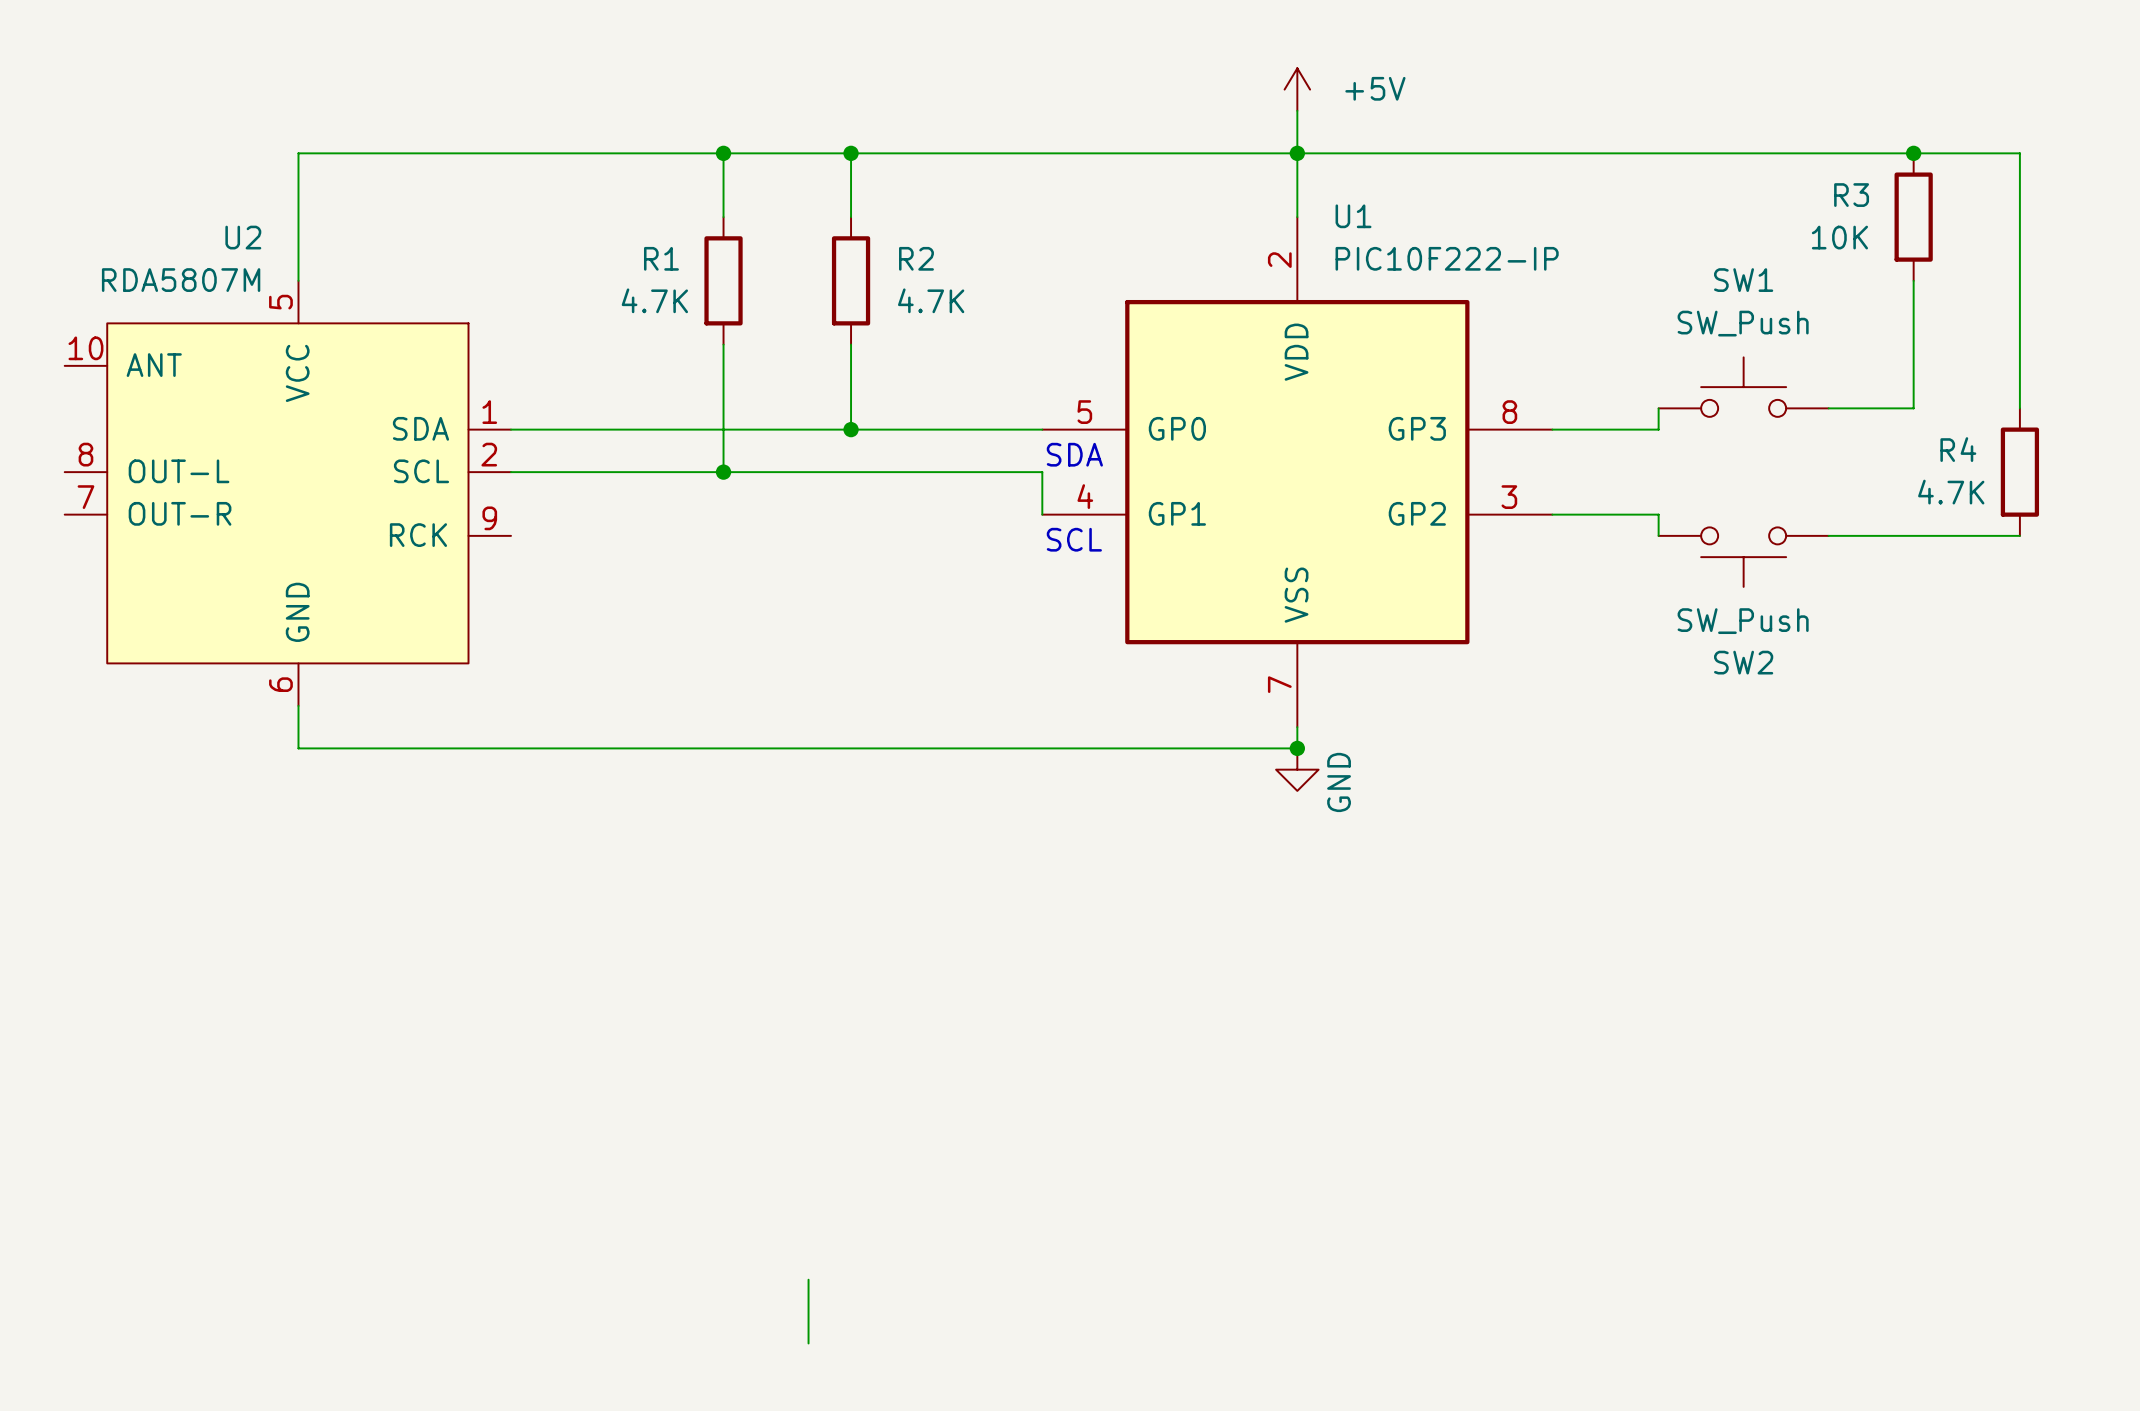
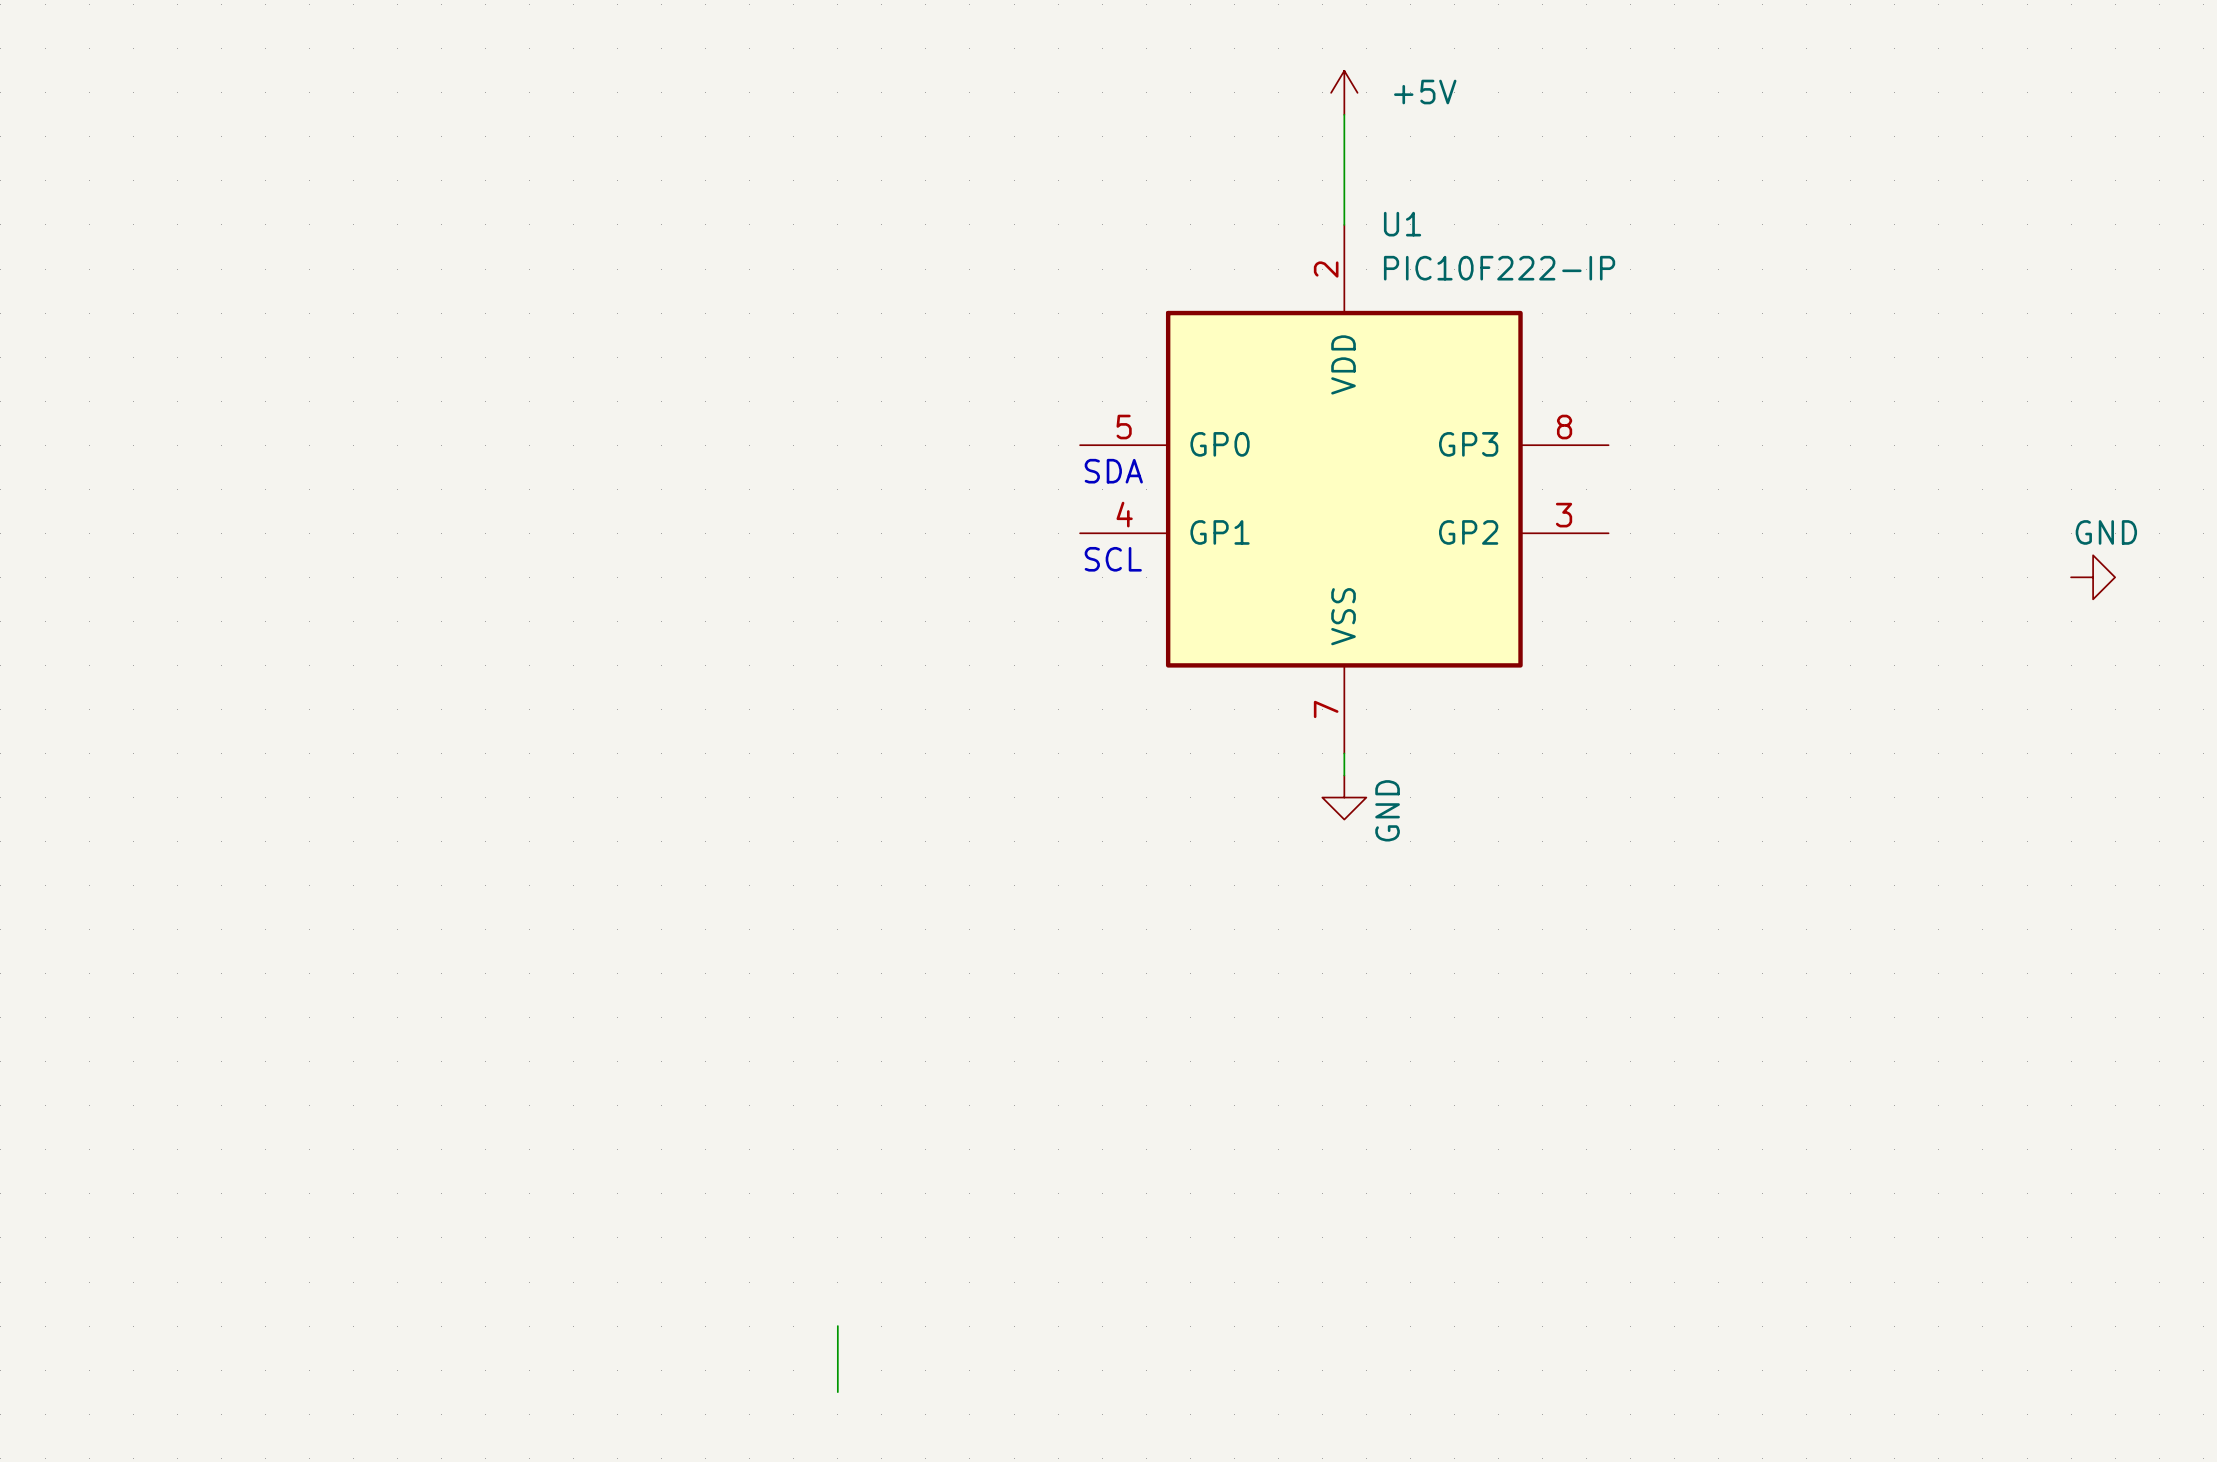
wire: (723, 153) (723, 217) -> none
junction: (723, 153) -> none
wire: (851, 153) (851, 217) -> none
junction: (851, 153) -> none
junction: (1297, 153) -> none
junction: (1913, 153) -> none
R3: 10K (1913, 217) -> none
wire: (298, 280) (298, 153) (2019, 153) (2019, 408) -> none
R1: 4.7K (723, 280) -> none
R2: 4.7K (851, 280) -> none
wire: (1913, 280) (1913, 408) (1828, 408) -> none
wire: (723, 344) (723, 472) -> none
wire: (851, 344) (851, 429) -> none
SW1: SW_Push (1743, 387) -> none
wire: (1658, 408) (1658, 429) (1552, 429) -> none
wire: (511, 429) (1042, 429) -> none
junction: (851, 429) -> none
wire: (511, 472) (1042, 472) (1042, 514) -> none
junction: (723, 472) -> none
R4: 4.7K (2019, 472) -> none
U2: RDA5807M (287, 493) -> none
wire: (1552, 514) (1658, 514) (1658, 535) -> none
wire: (1828, 535) (2019, 535) -> none
SW2: SW_Push (1743, 557) -> none
power symbol: none -> GND (2093, 577)
wire: (298, 705) (298, 748) (1297, 748) -> none
junction: (1297, 748) -> none

